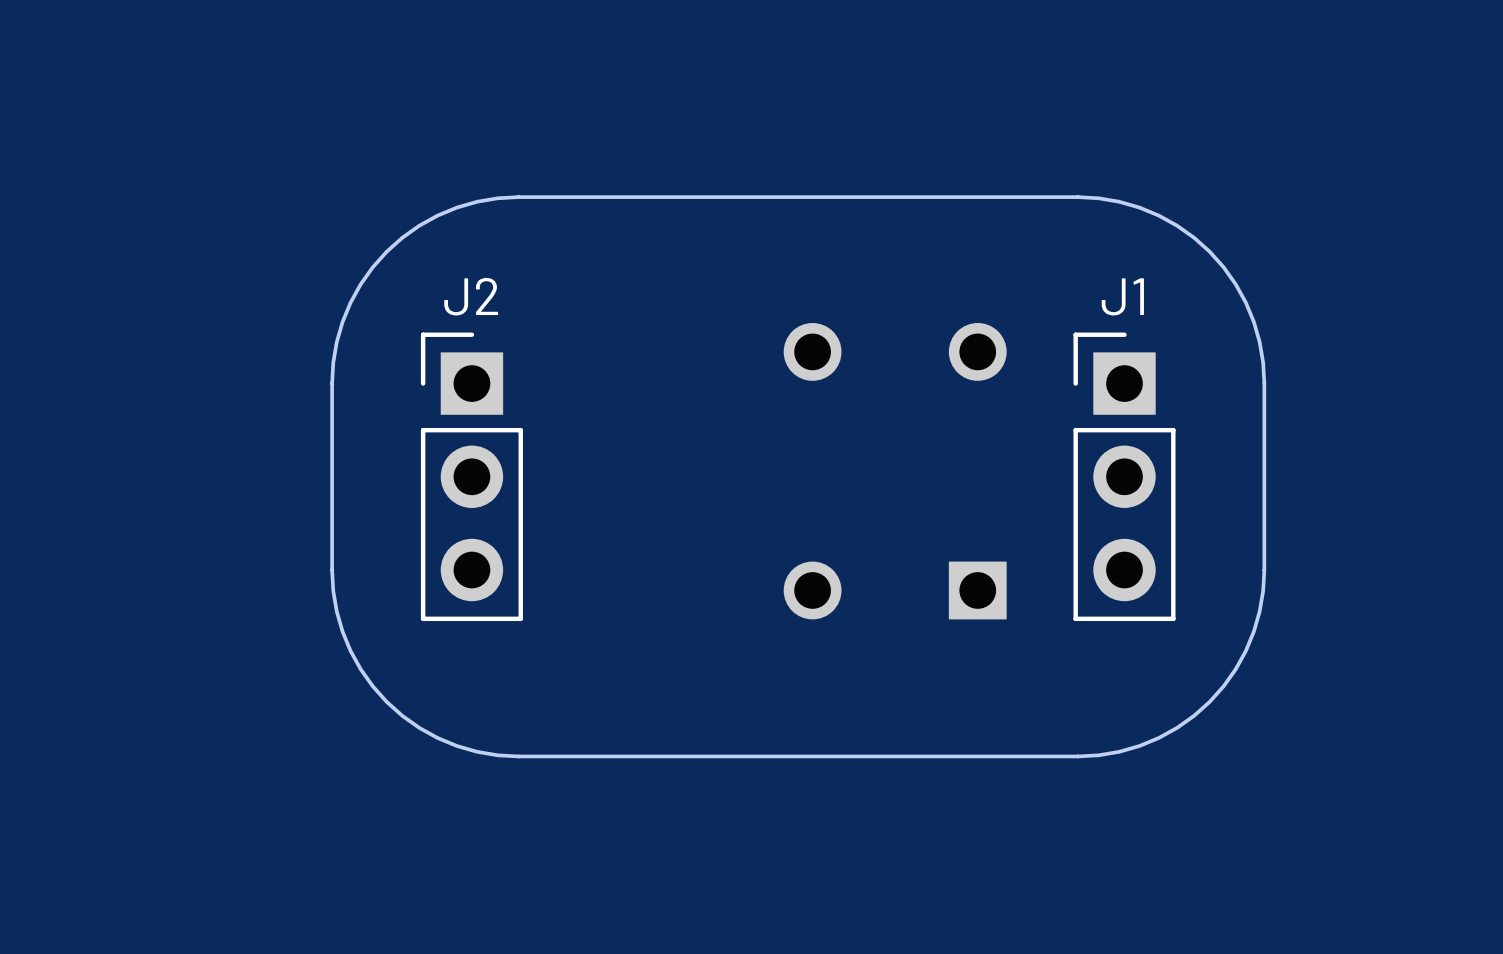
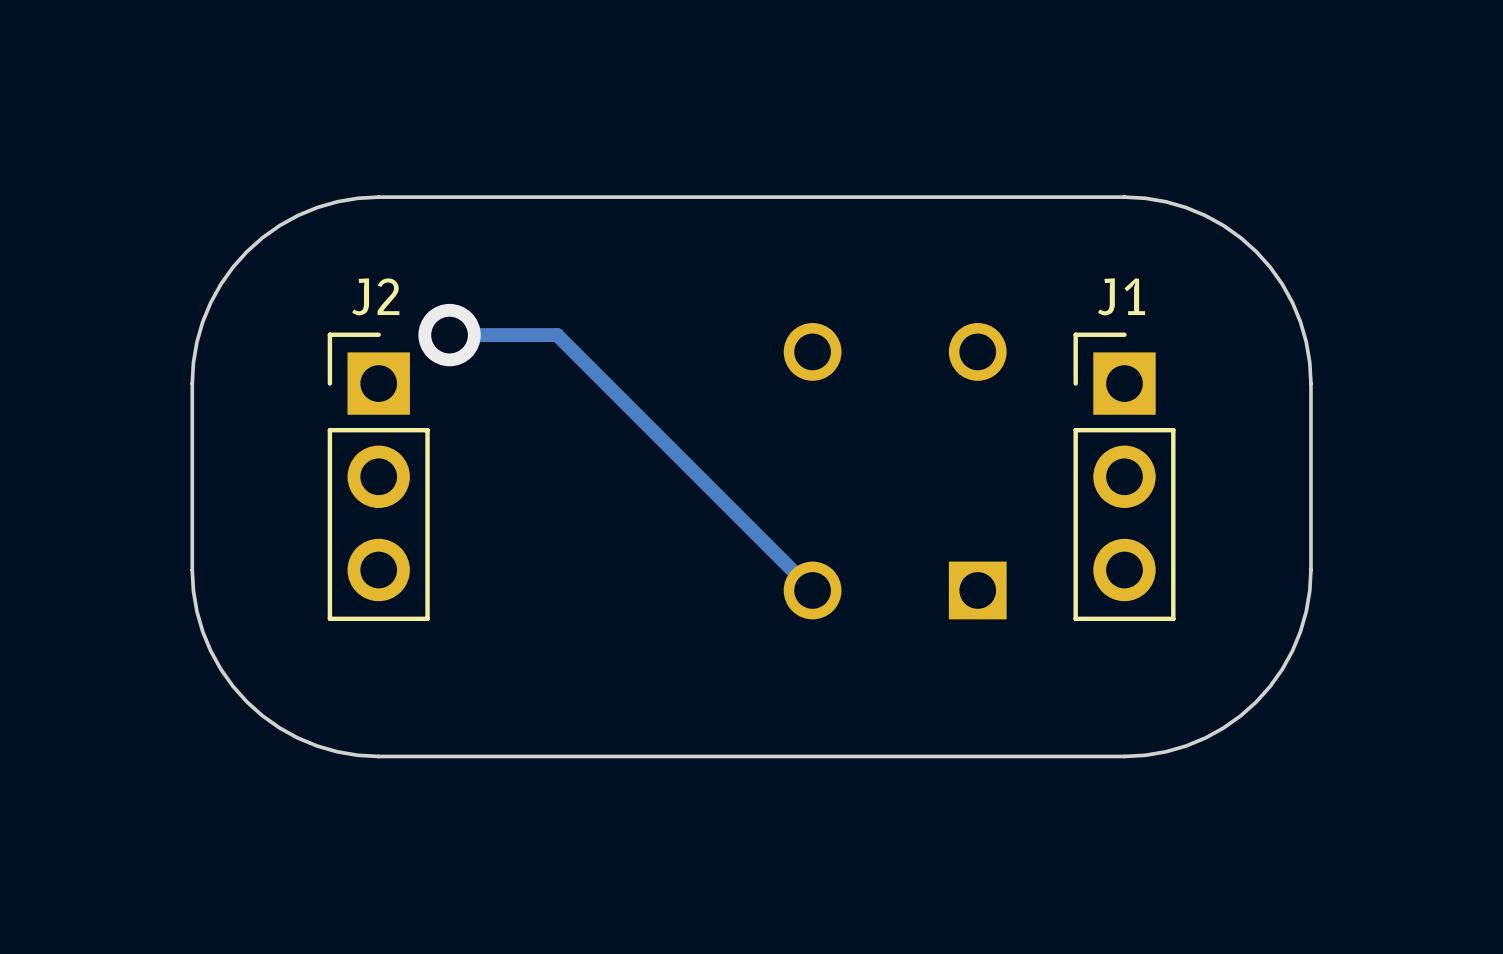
board edge: (518, 197) (477, 201) (437, 215) (402, 237) (386, 251) (372, 267) (350, 302) (336, 342) (332, 383) (333, 590) (336, 611) (350, 650) (360, 669) (386, 701) (419, 727) (456, 746) (477, 751) (518, 756) -> (518, 197) (357, 198) (317, 207) (279, 225) (246, 251) (232, 267) (210, 302) (196, 342) (192, 383) (193, 590) (202, 631) (220, 669) (232, 686) (262, 715) (279, 727) (317, 746) (337, 751) (378, 756) (518, 756)
board edge: (1077, 197) (1119, 201) (1139, 207) (1177, 225) (1194, 237) (1223, 267) (1245, 302) (1259, 342) (1263, 362) (1264, 570) (1259, 611) (1245, 650) (1235, 669) (1209, 701) (1177, 727) (1139, 746) (1119, 751) (1077, 756) -> (1077, 197) (1145, 198) (1186, 207) (1205, 215) (1223, 225) (1256, 251) (1282, 284) (1300, 321) (1309, 362) (1310, 570) (1306, 611) (1292, 650) (1270, 686) (1240, 715) (1205, 738) (1165, 751) (1124, 756) (1077, 756)
track: none -> (449, 335) (557, 335) (812, 590)
via: none -> (449, 335)
J2 position: (471, 476) -> (378, 476)

